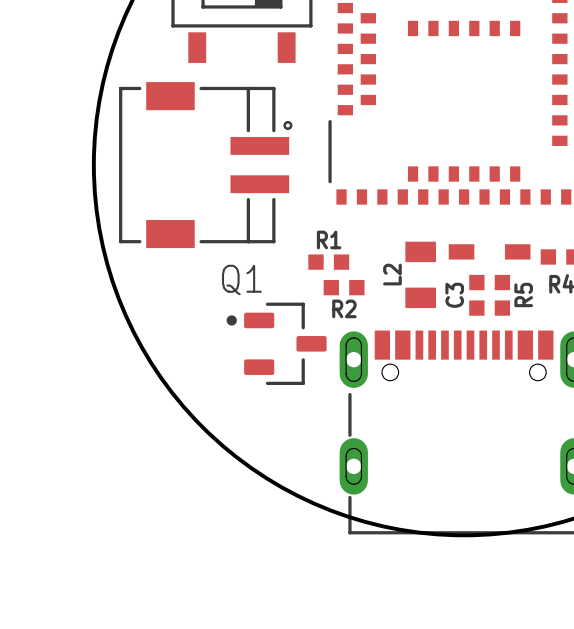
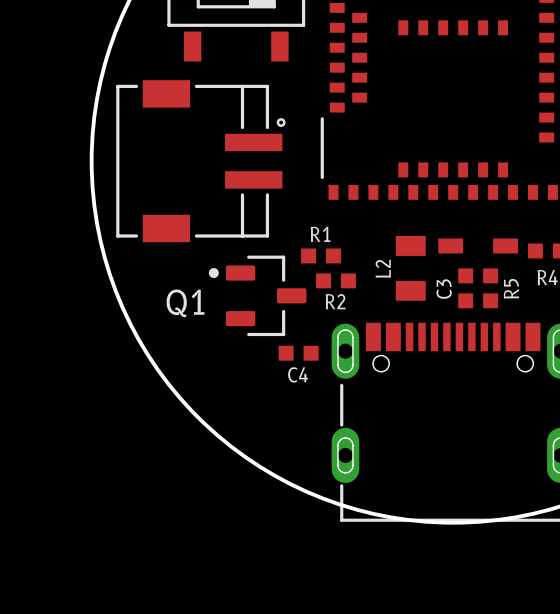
Q1 name position: Q1 (241, 279) -> Q1 (185, 303)
Q1 position: (276, 343) -> (257, 295)
C4: none -> (298, 353)

